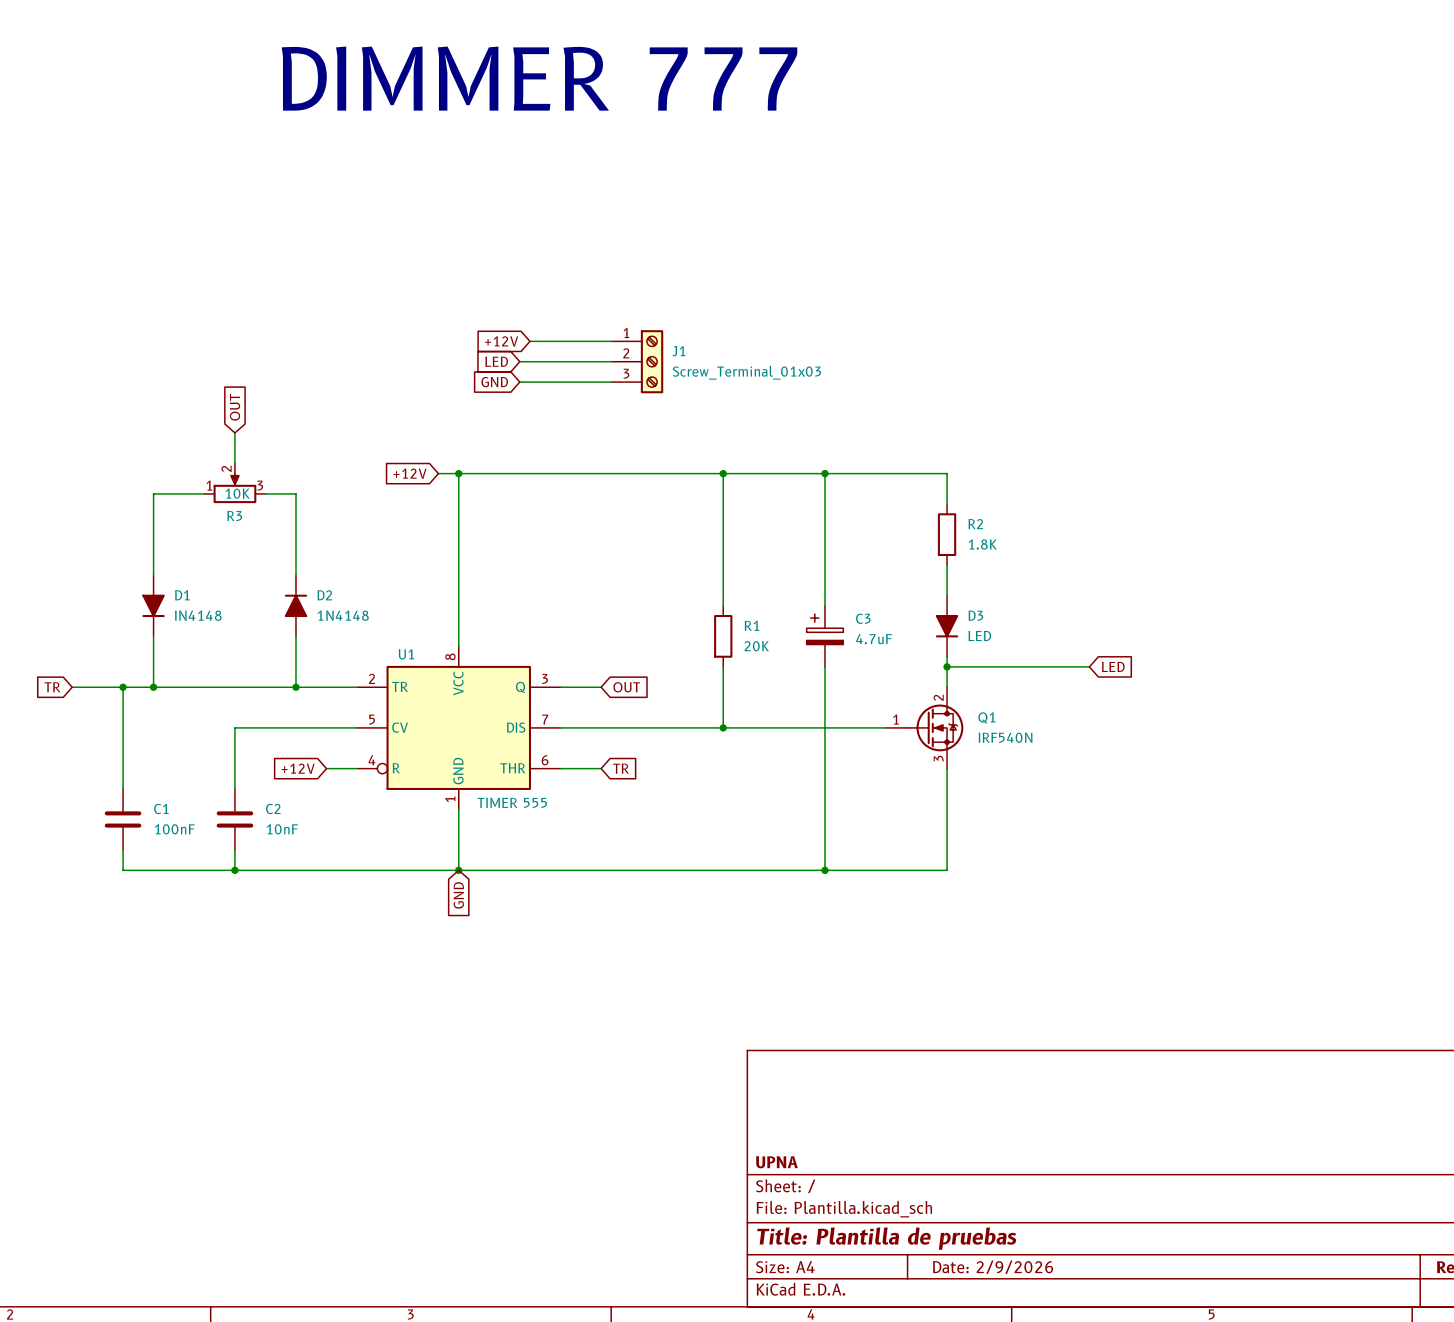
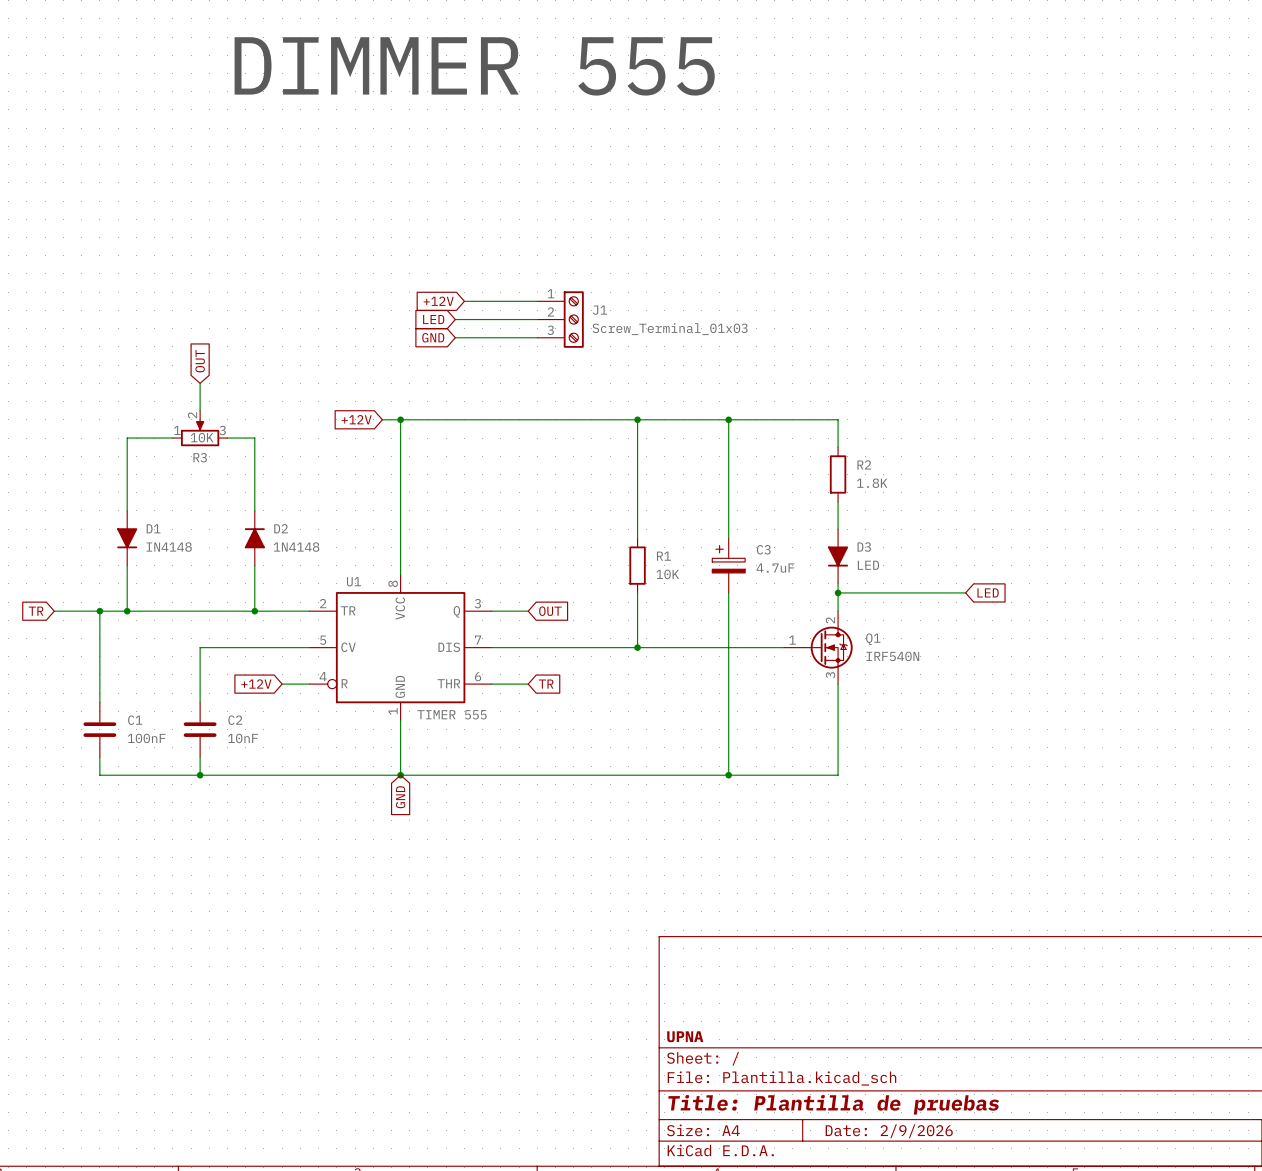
text: DIMMER 777 (539, 78) -> DIMMER 555 (474, 66)
R1 value: 20K (756, 646) -> 10K (667, 574)

